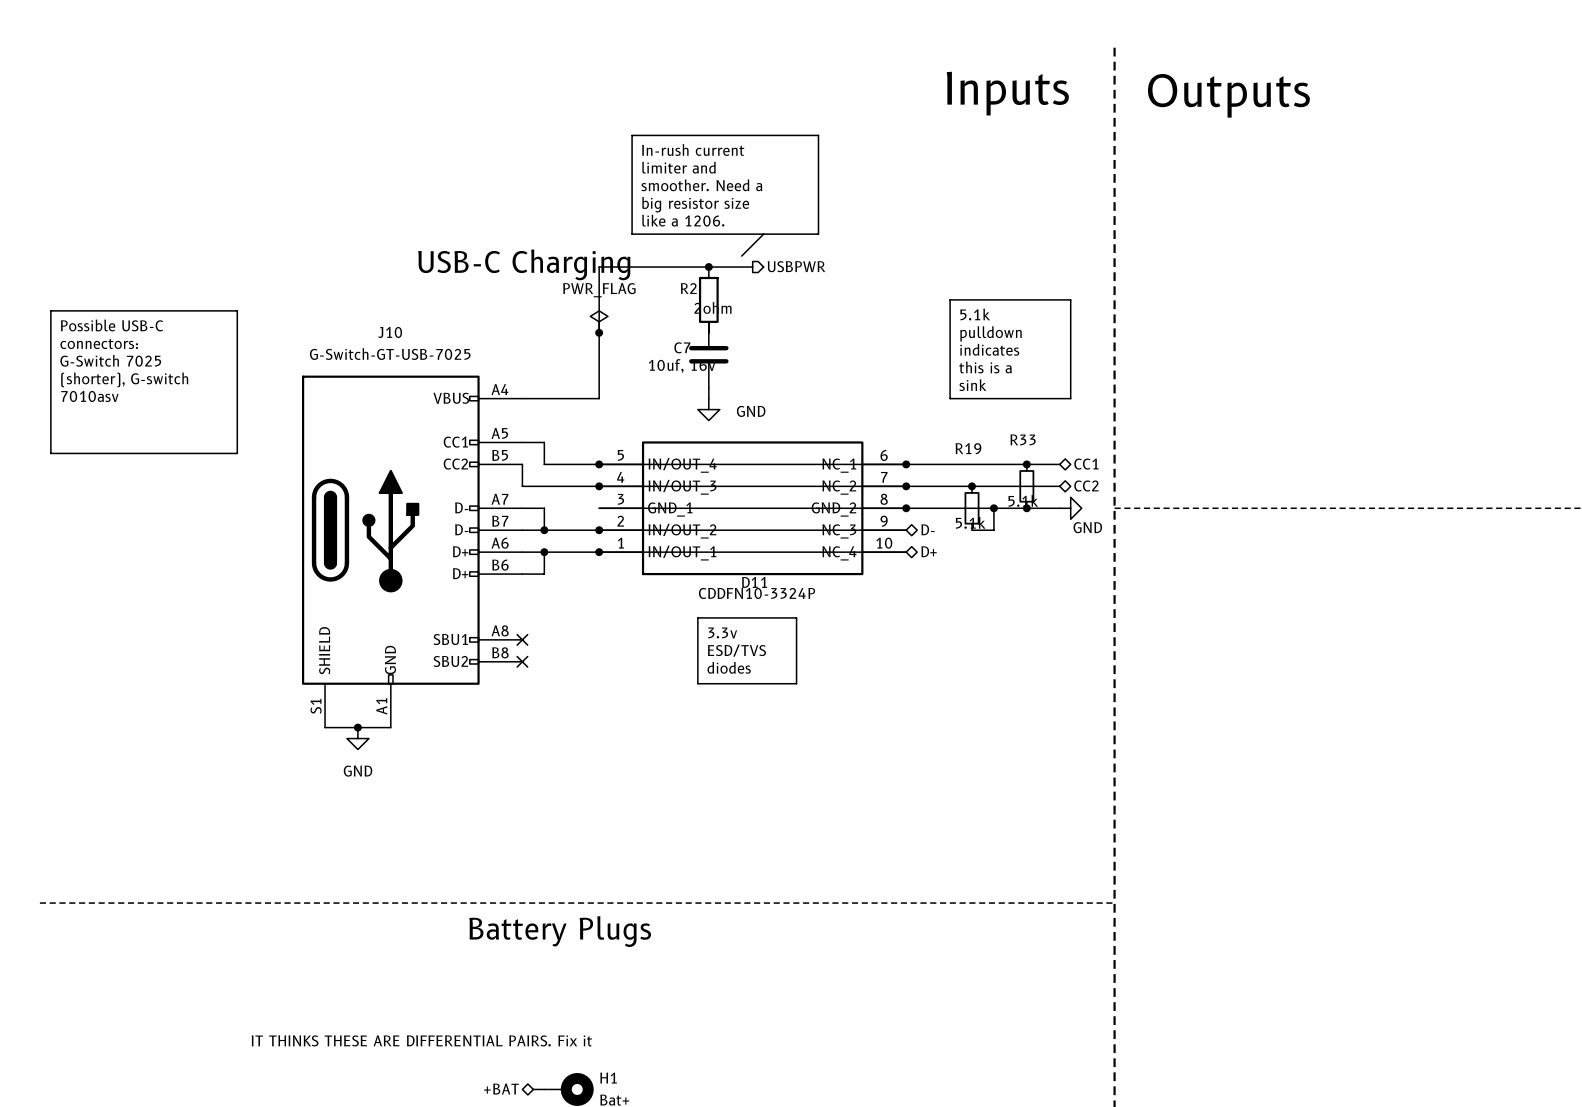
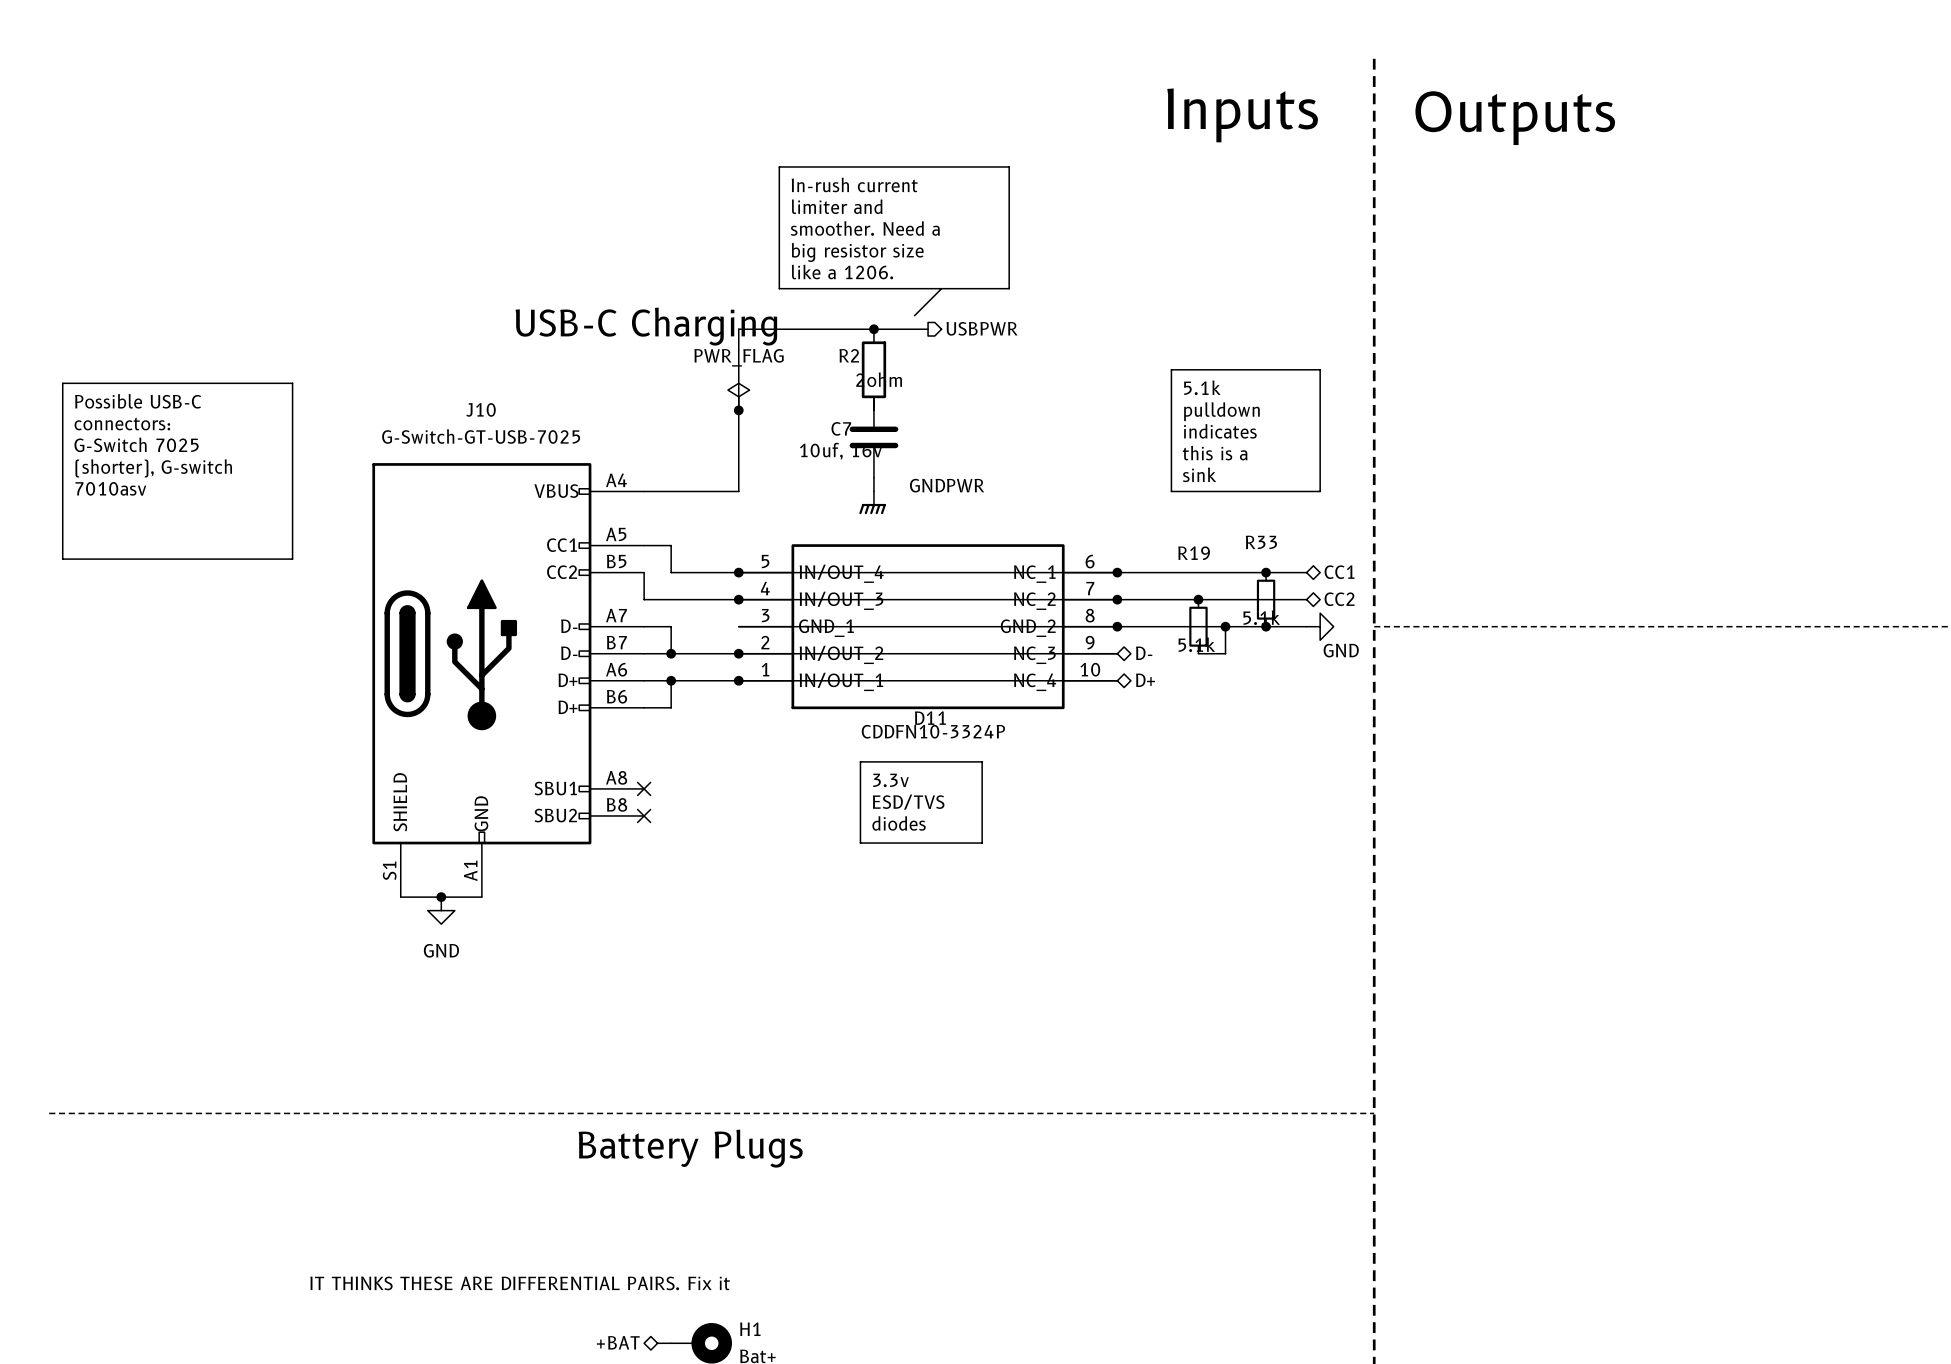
power symbol: GND (708, 409) -> GNDPWR (872, 502)

